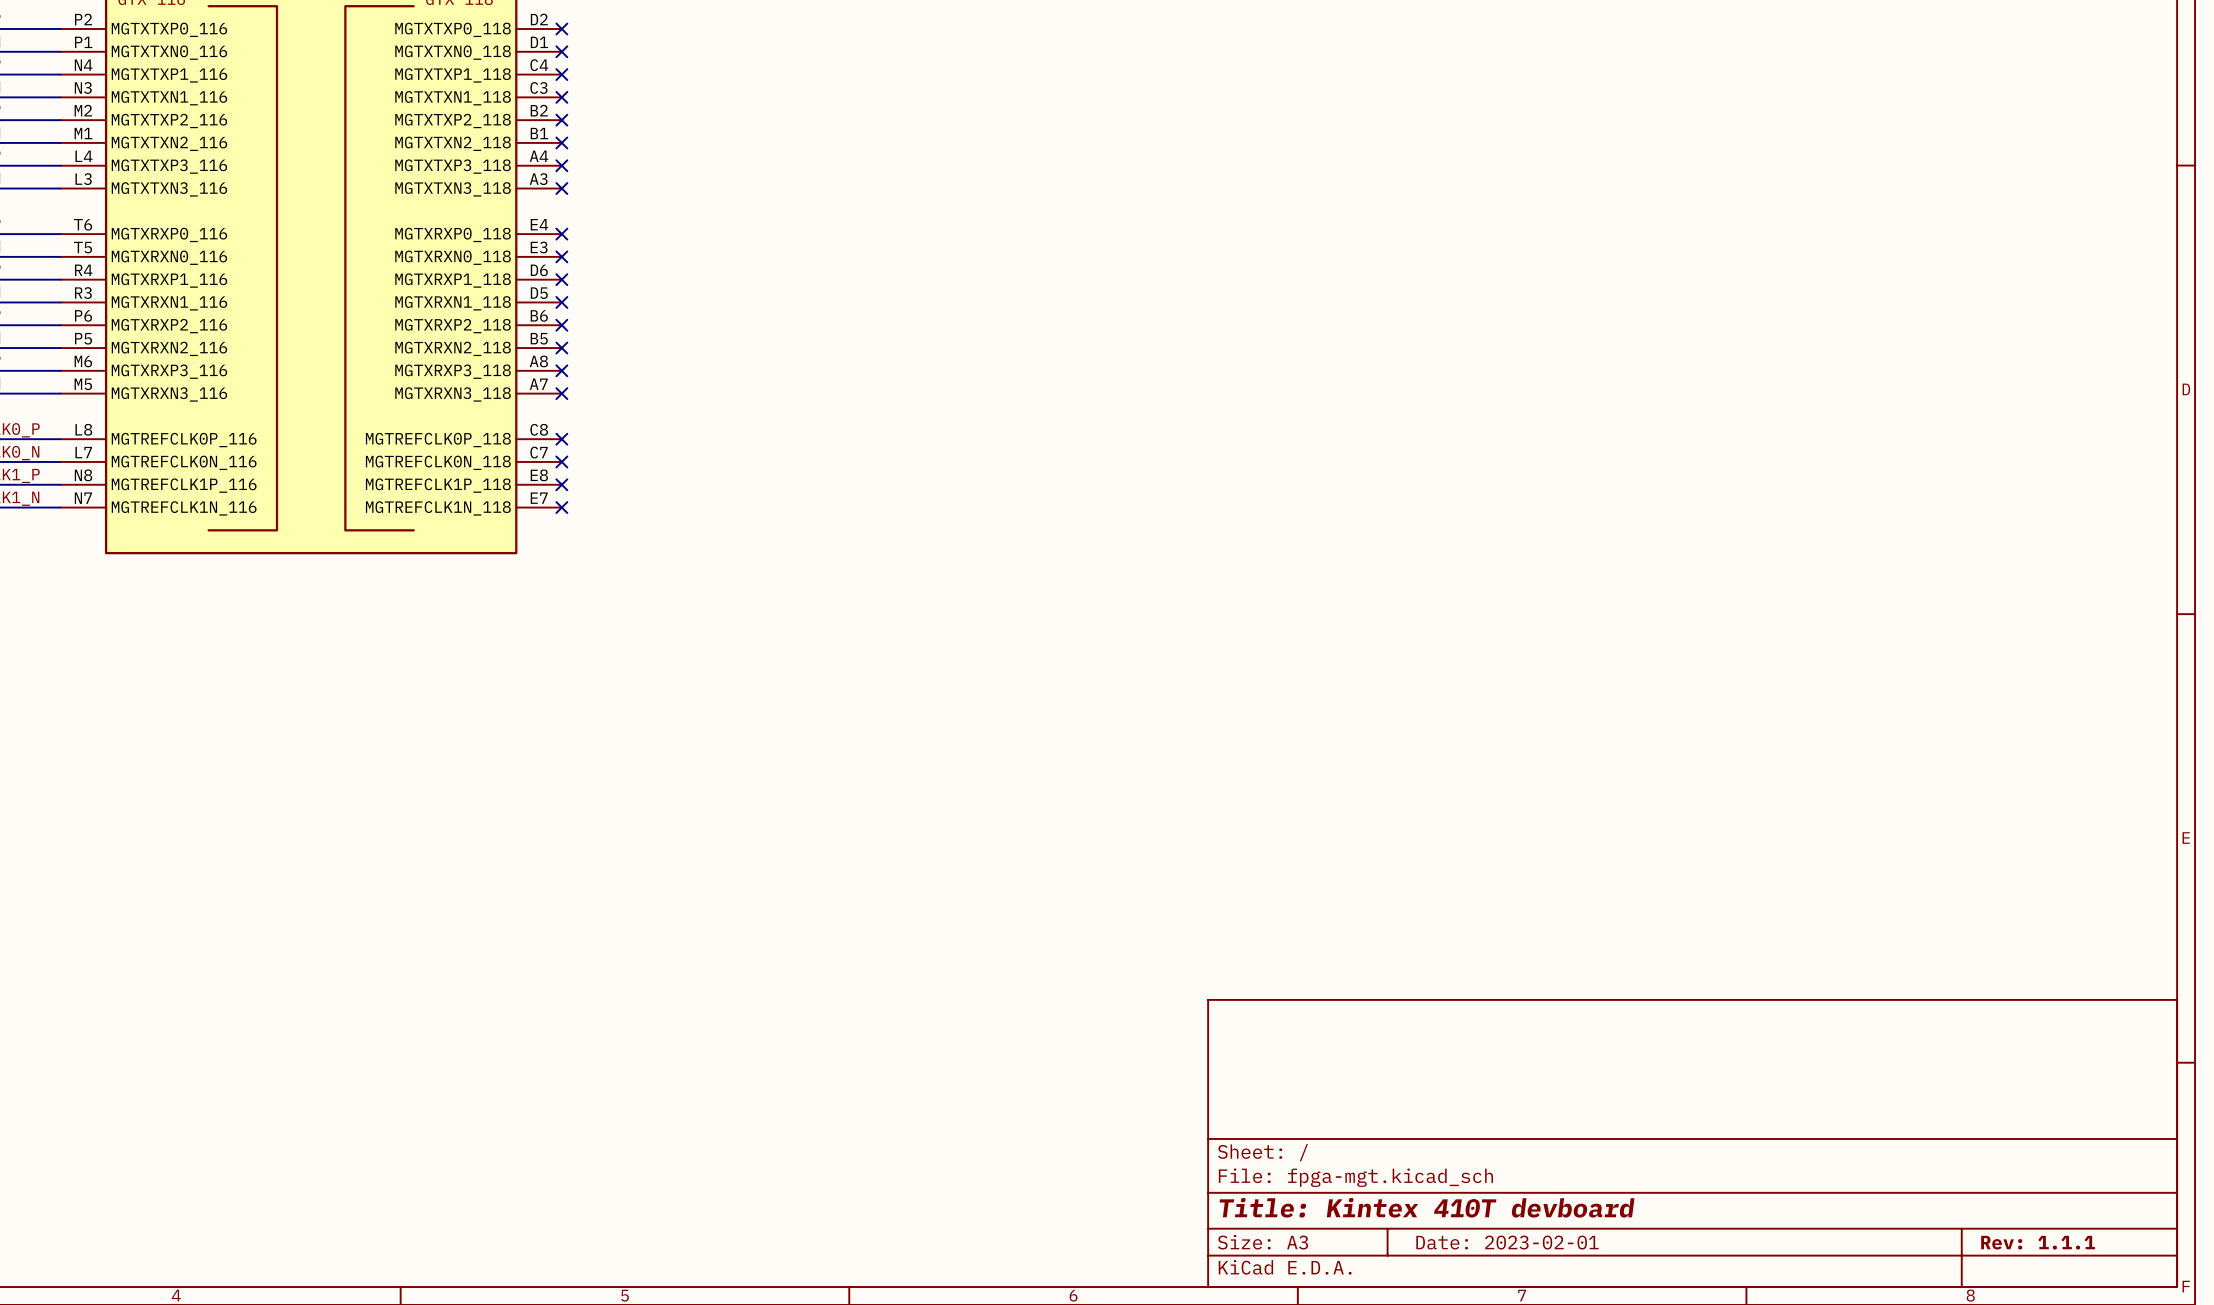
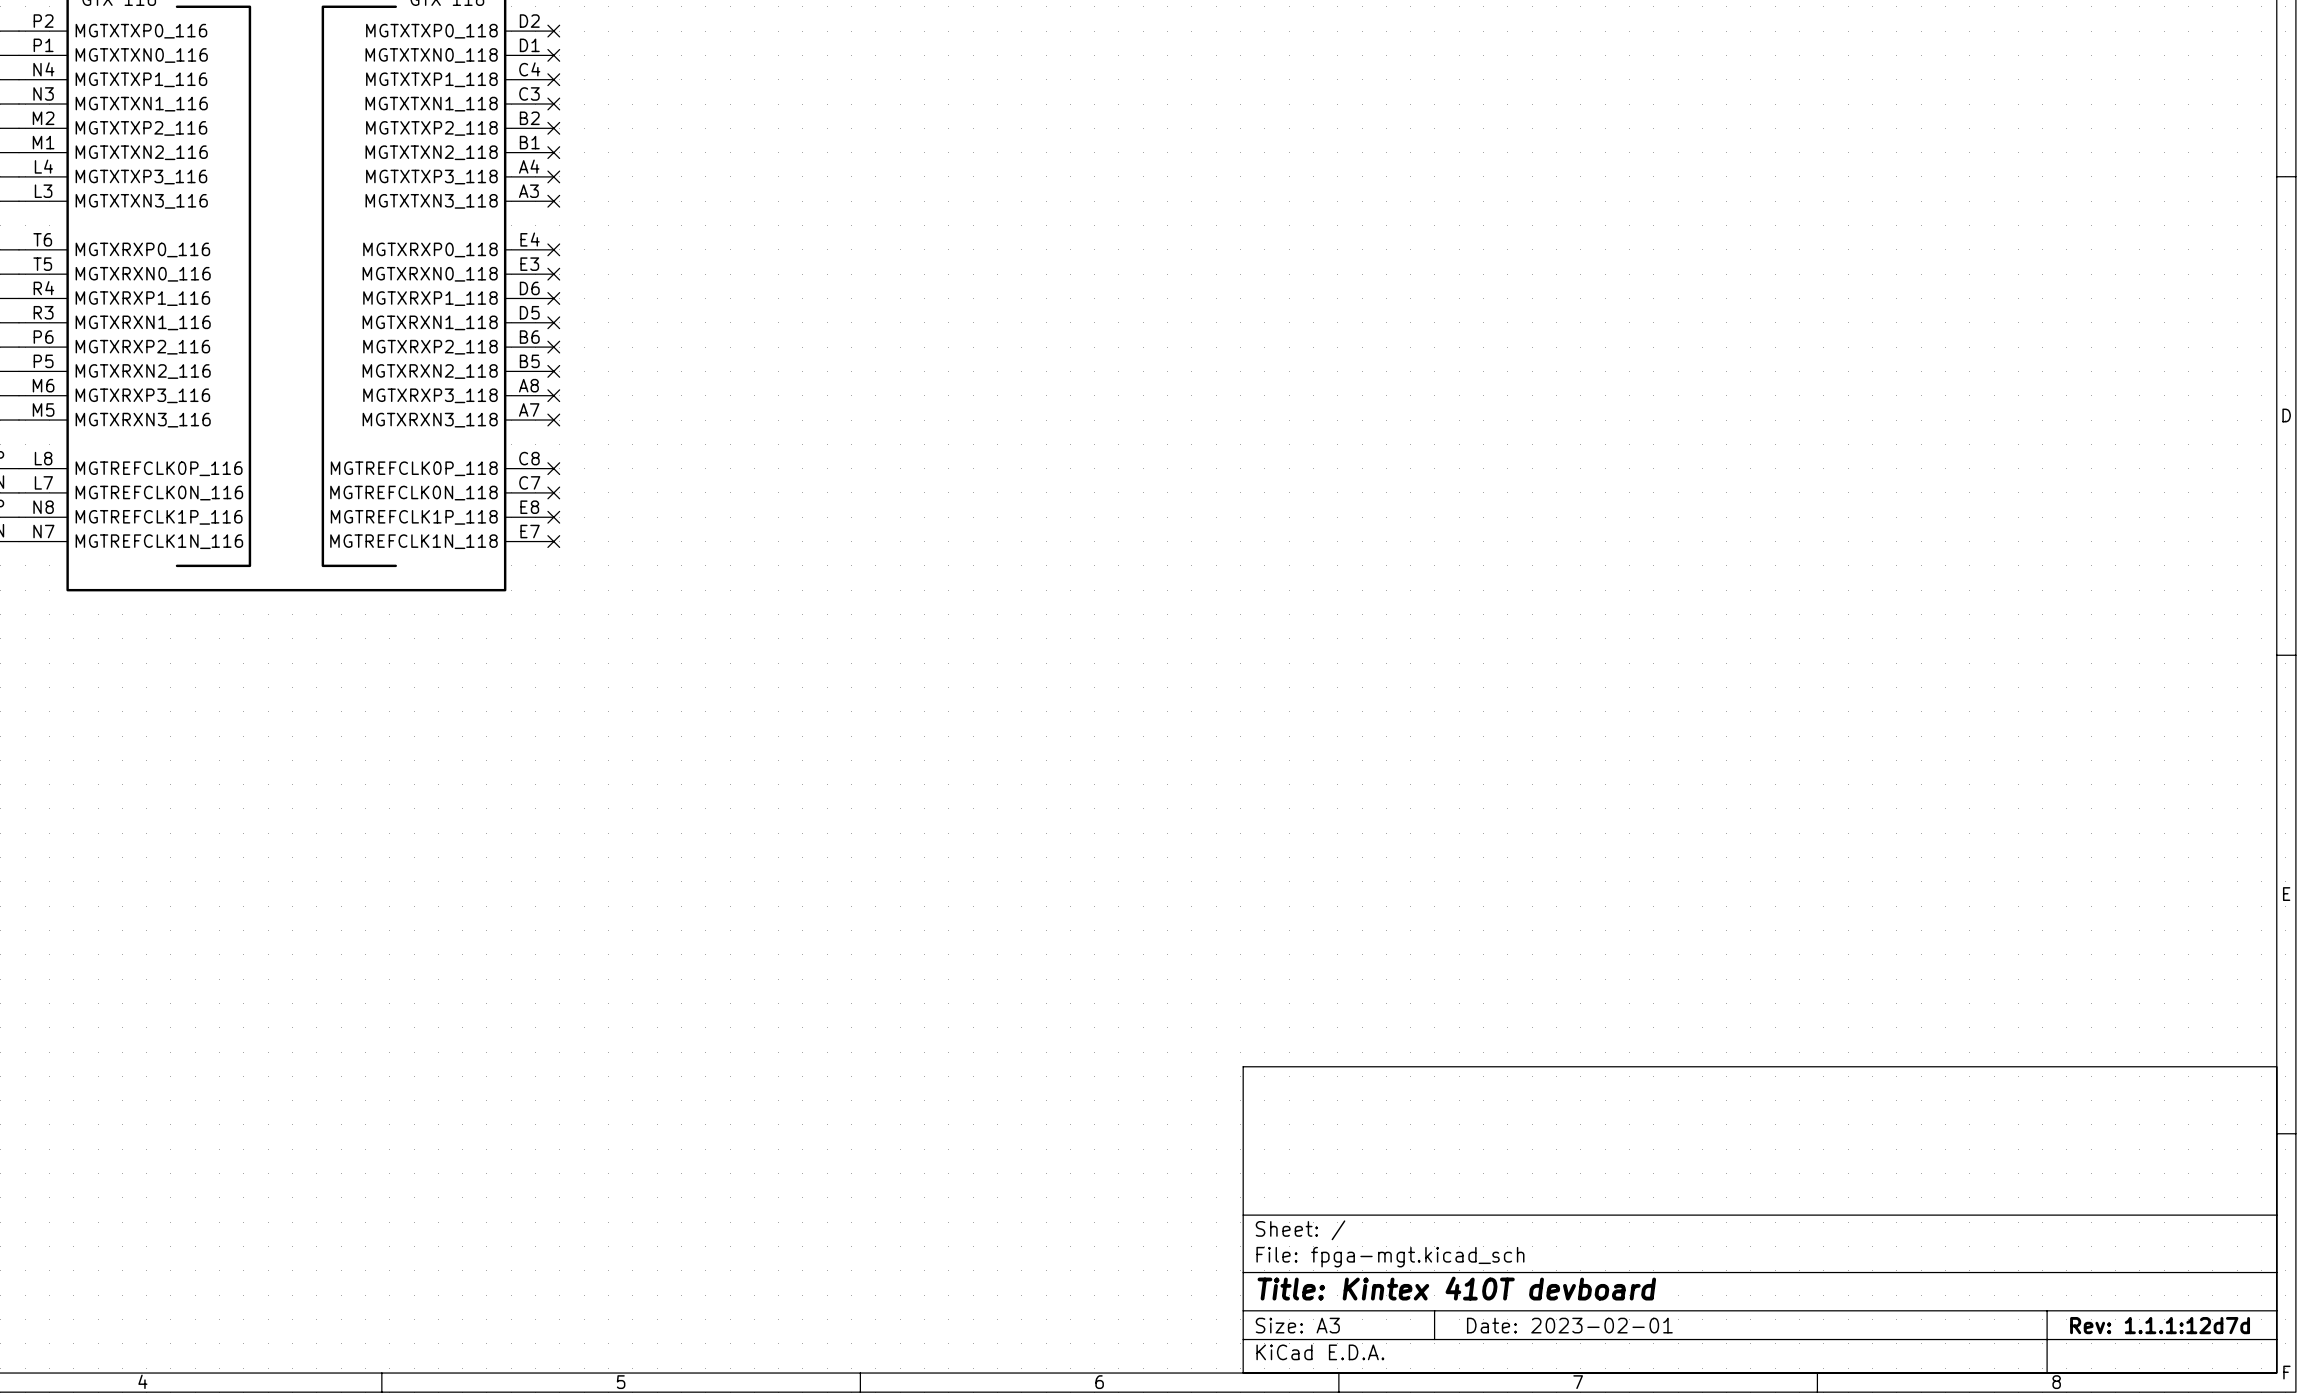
title block: Rev: 1.1.1 (2038, 1242) -> Rev: 1.1.1:12d7d (2160, 1325)

